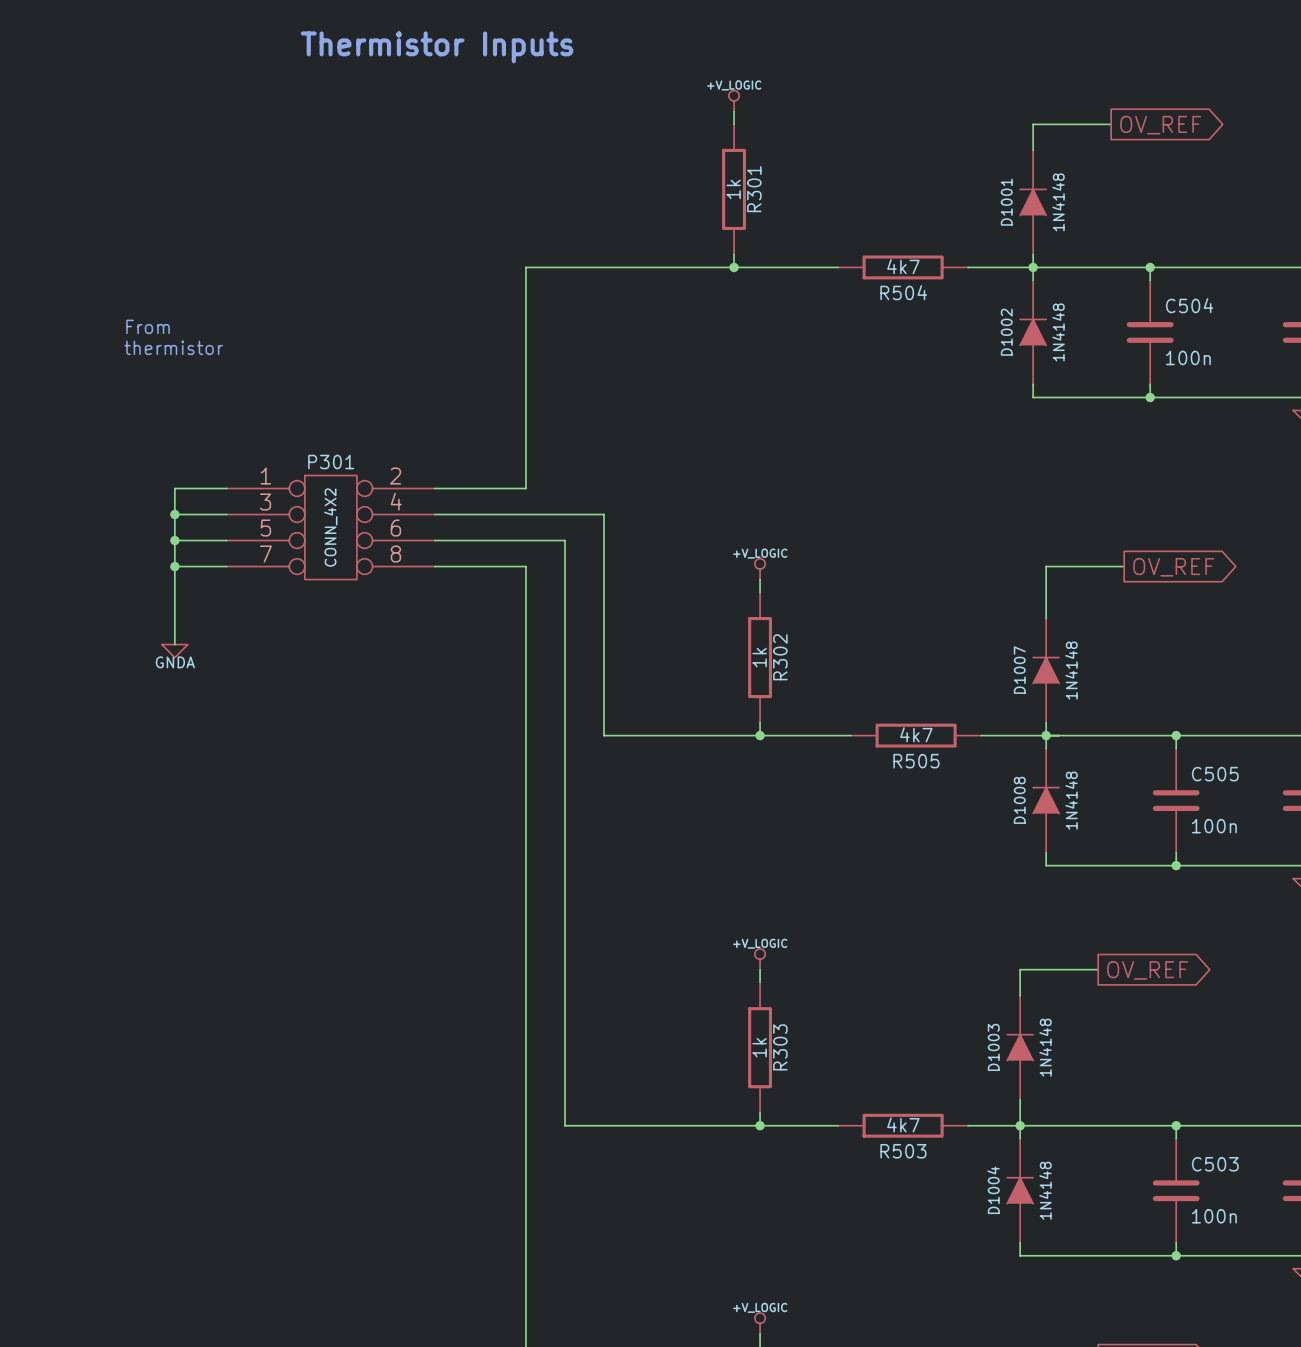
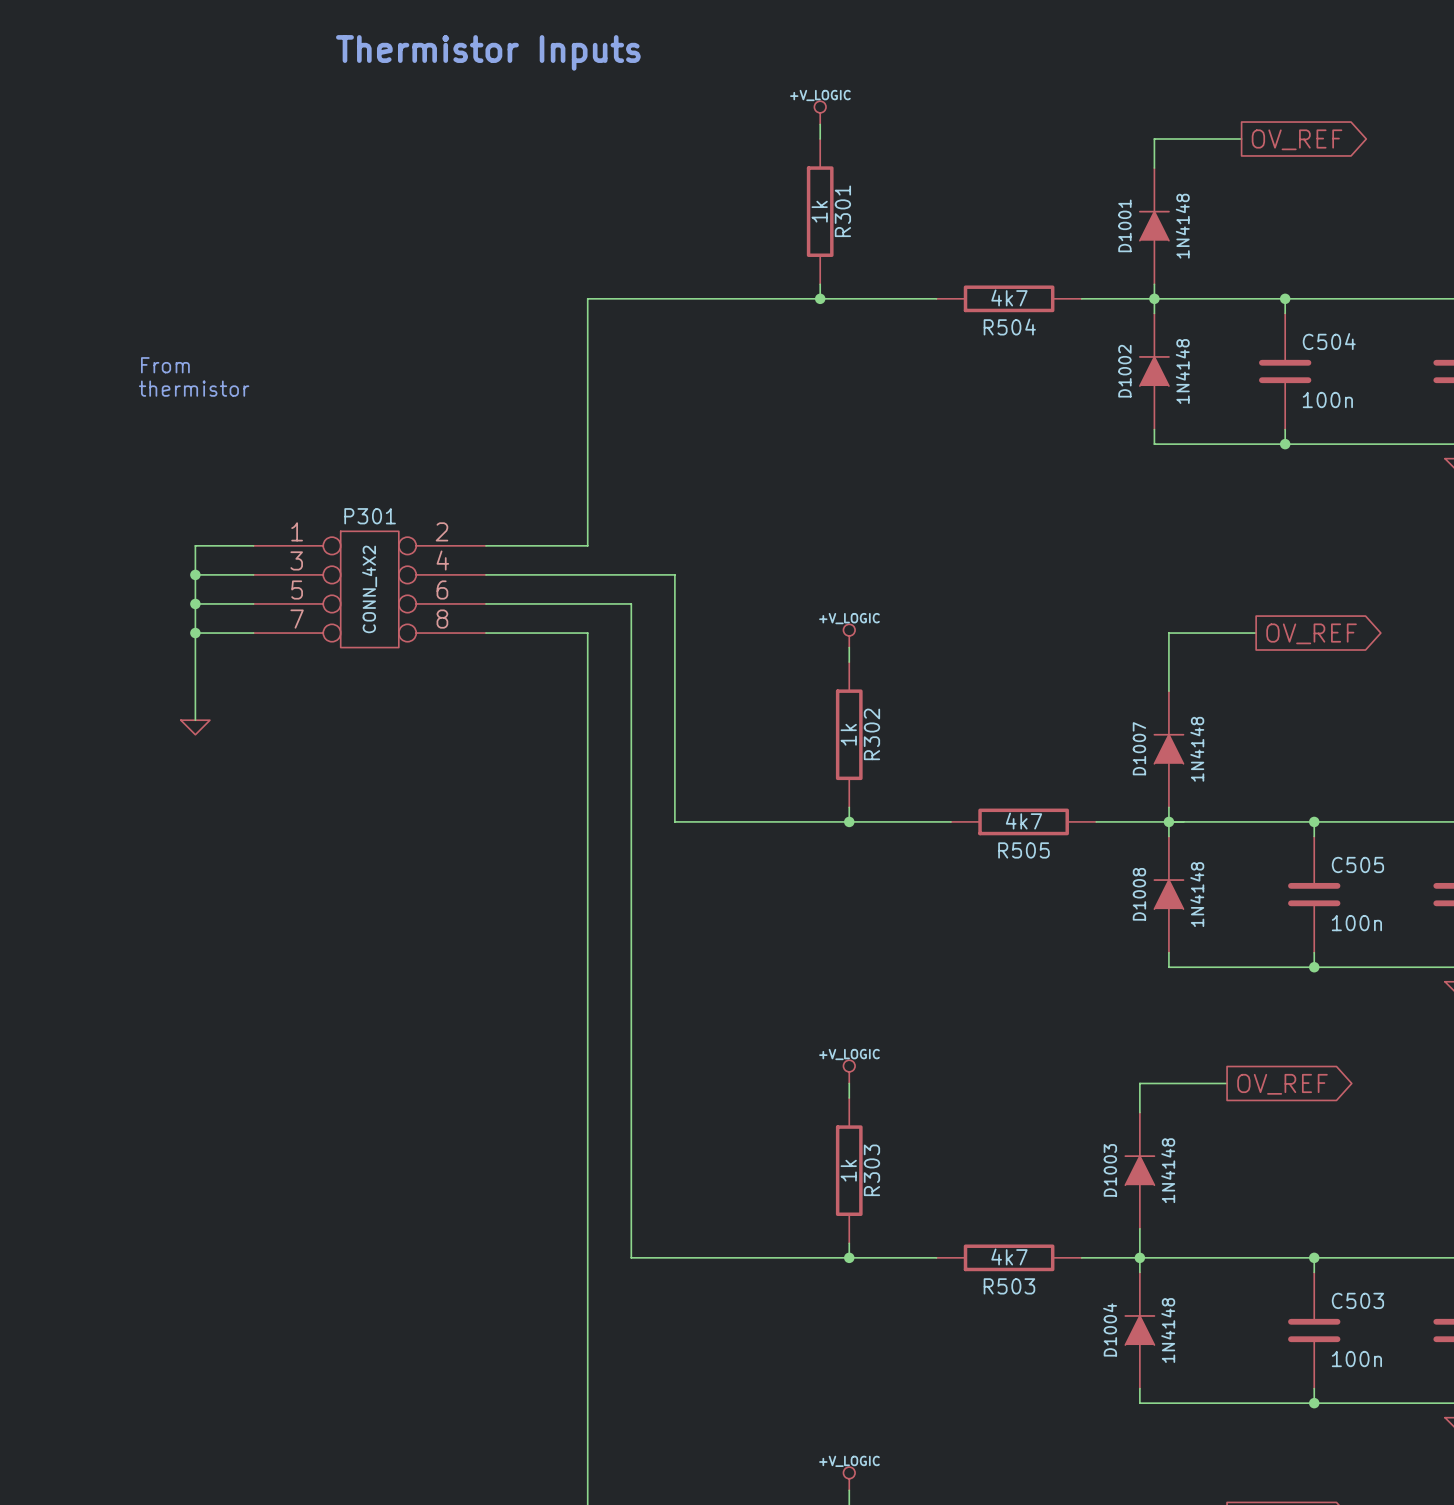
power symbol text: GNDA (175, 662) -> none

